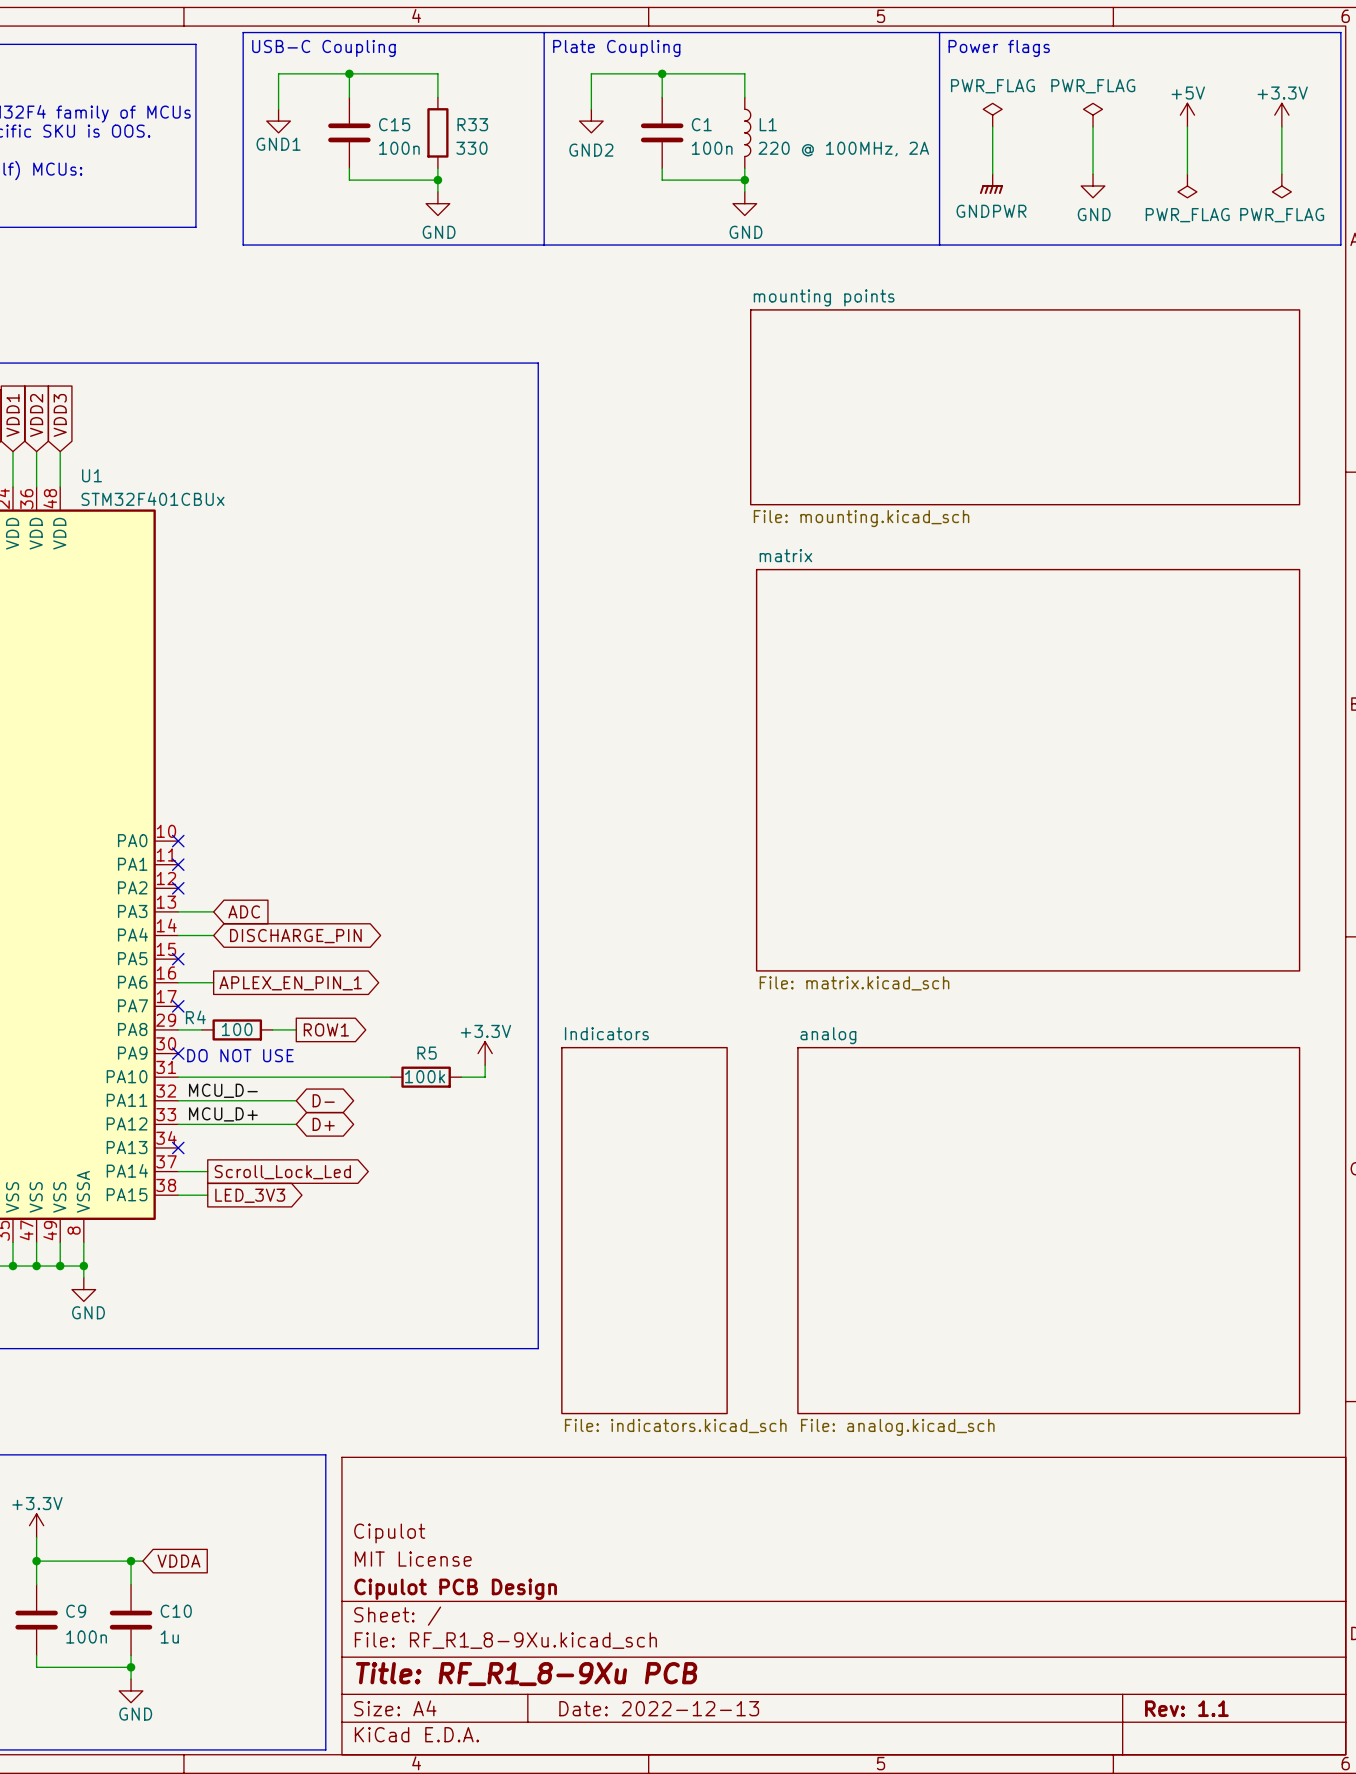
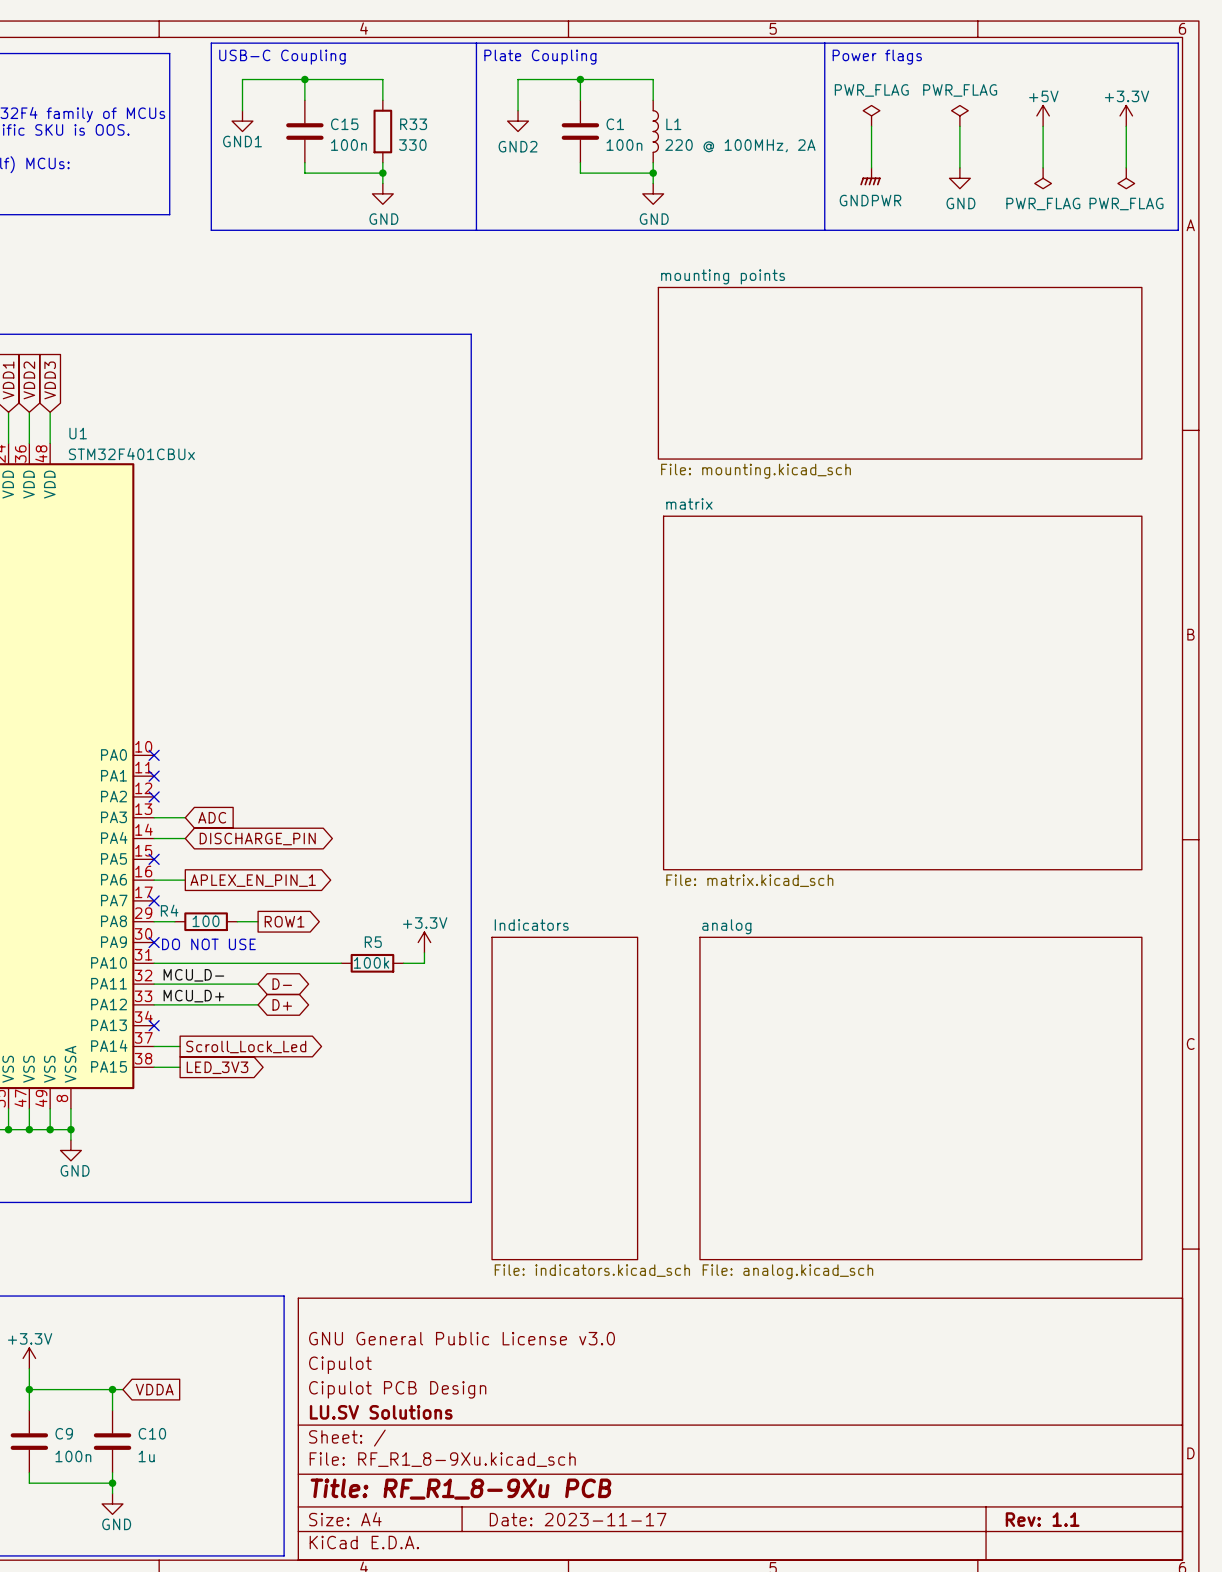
title block: none -> GNU General Public License v3.0 (462, 1338)
title block: MIT License (413, 1559) -> Cipulot PCB Design (397, 1389)
title block: Cipulot PCB Design (455, 1589) -> LU.SV Solutions (381, 1412)
title block: Date: 2022-12-13 (659, 1708) -> Date: 2023-11-17 (578, 1519)

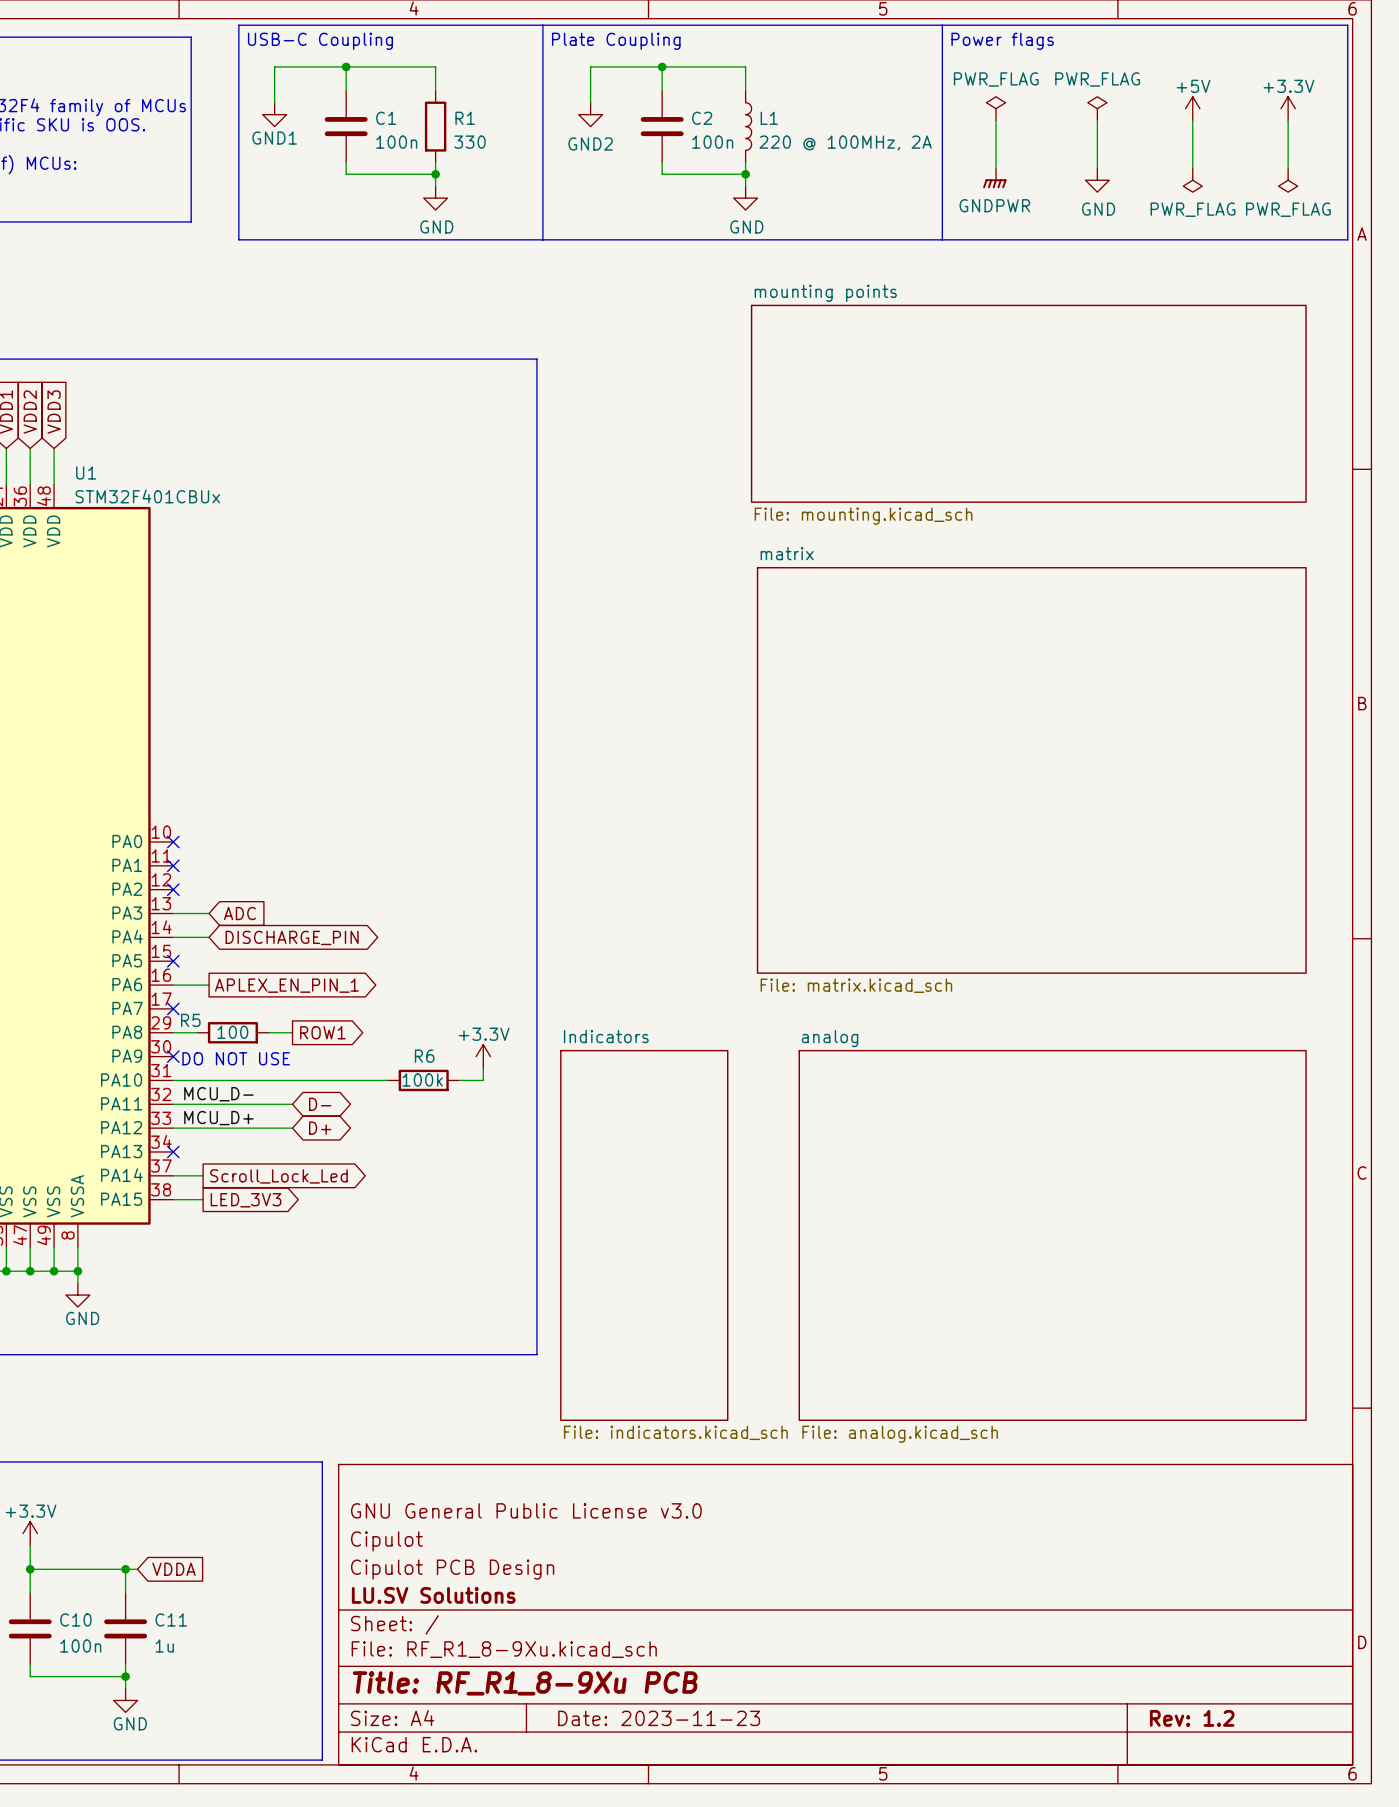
C15 name: C15 (344, 124) -> C1 (386, 118)
R33 name: R33 (413, 124) -> R1 (465, 118)
C1 name: C1 (615, 124) -> C2 (702, 118)
R4 name: R4 (169, 910) -> R5 (190, 1020)
R5 name: R5 (373, 942) -> R6 (424, 1056)
C9 name: C9 (64, 1433) -> C10 (75, 1619)
C10 name: C10 (152, 1433) -> C11 (171, 1619)
title block: Date: 2023-11-17 (578, 1519) -> Date: 2023-11-23 (659, 1718)
title block: Rev: 1.1 (1042, 1519) -> Rev: 1.2 (1192, 1718)

